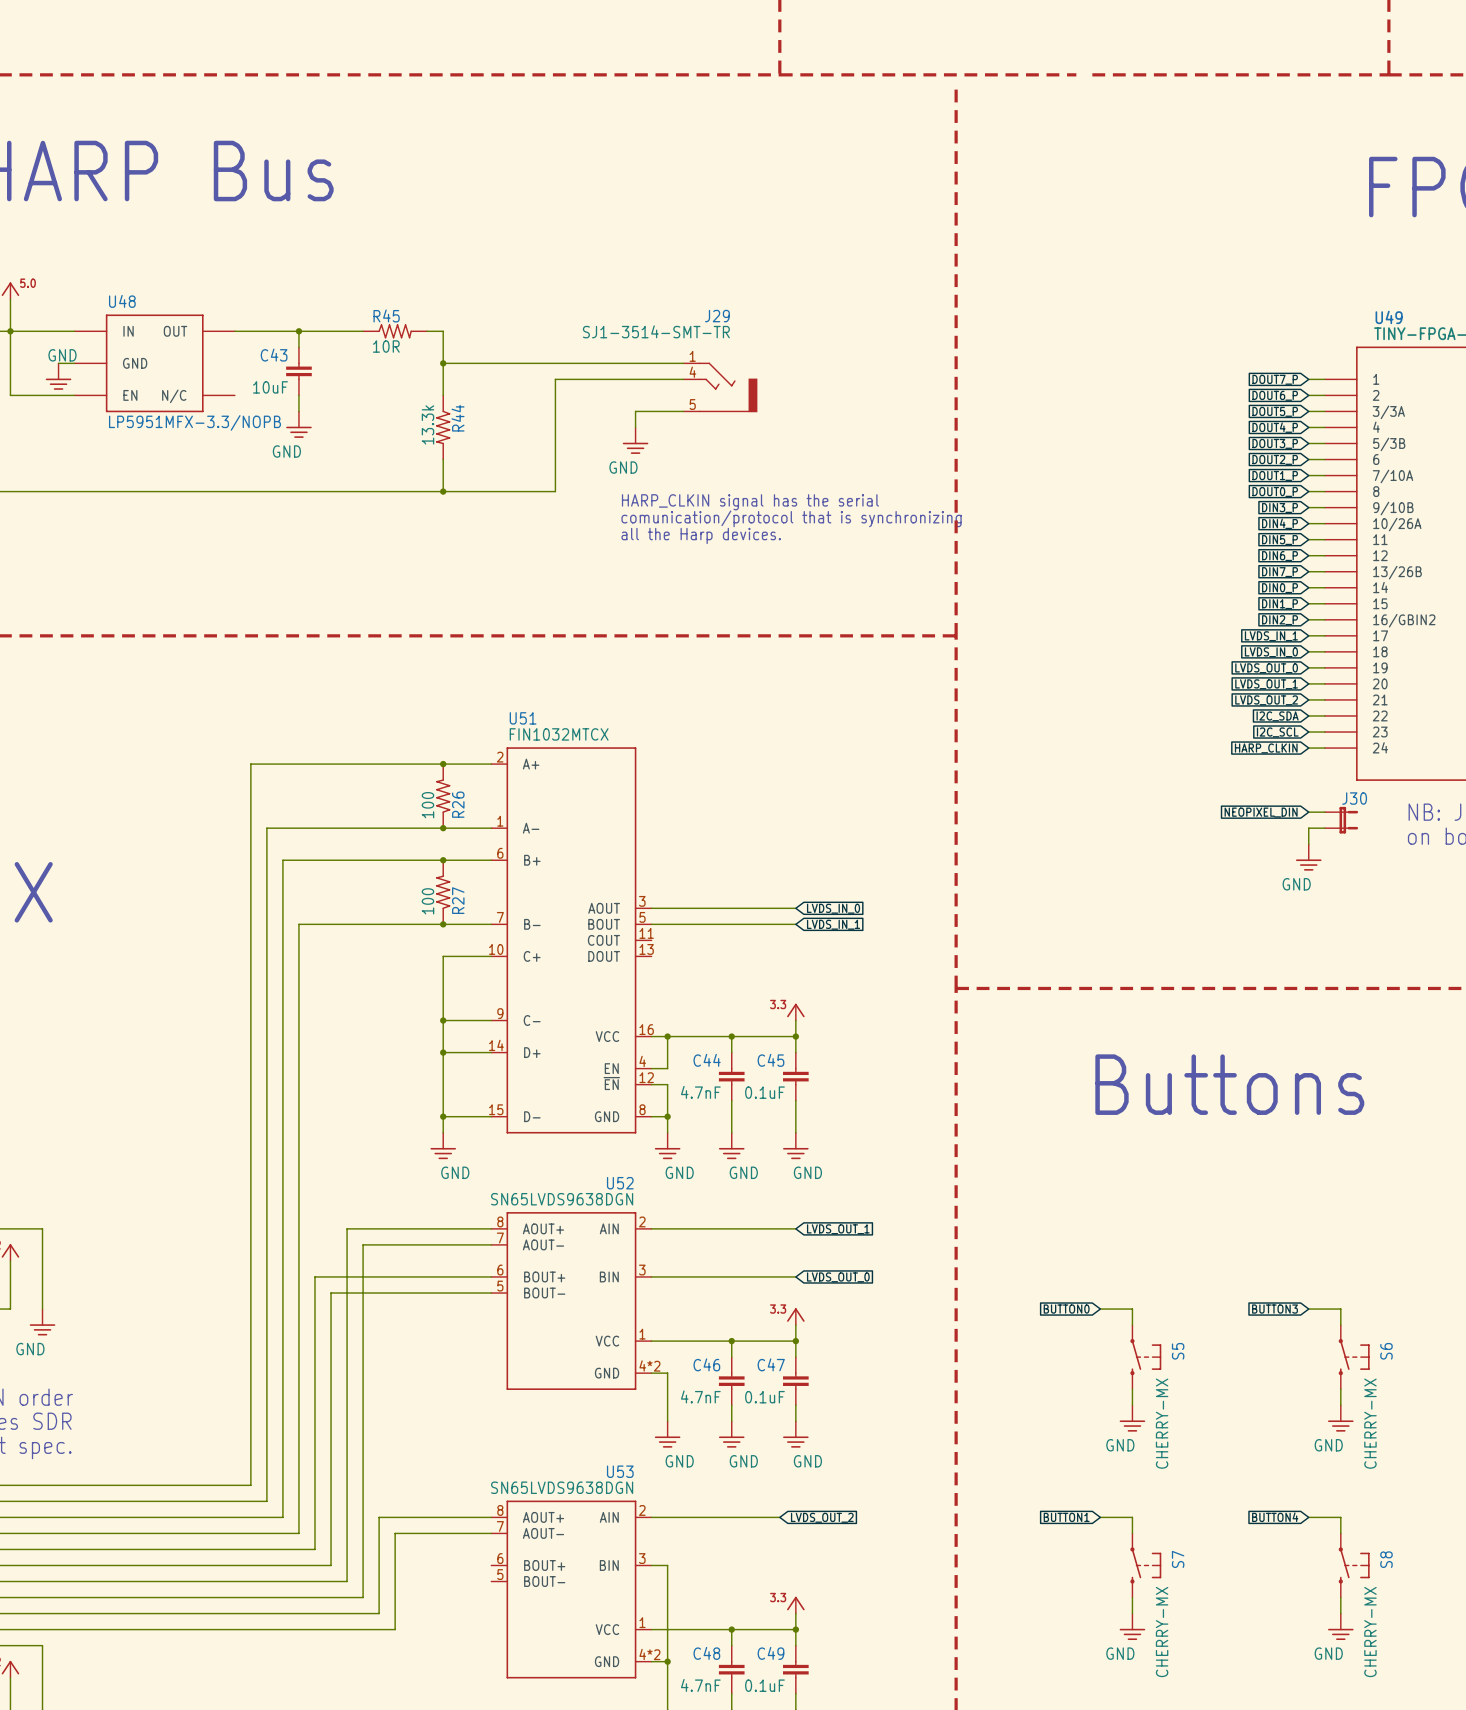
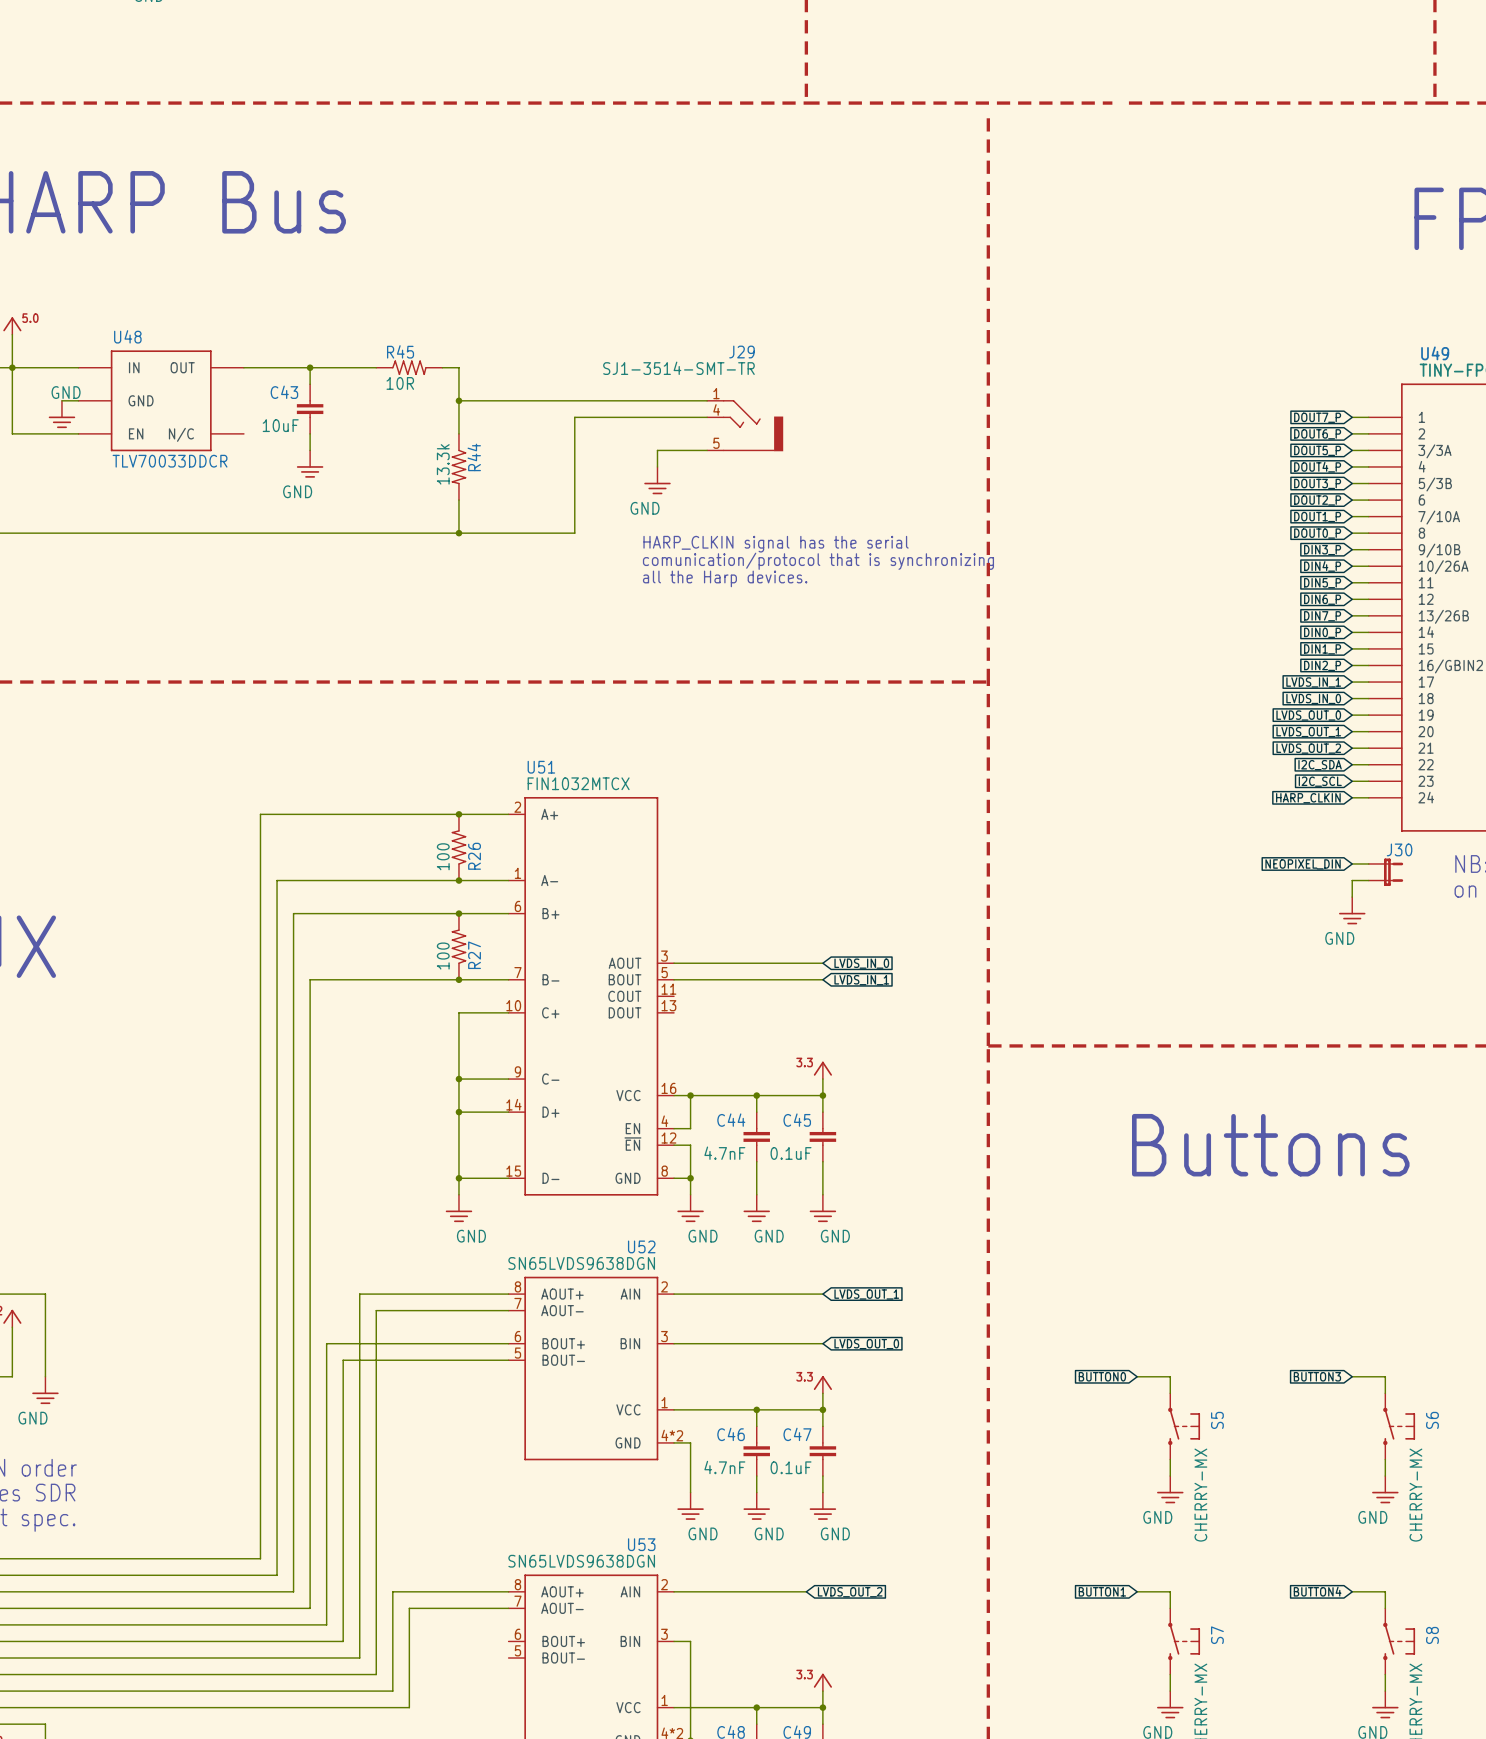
U48 value: LP5951MFX-3.3/NOPB (194, 422) -> TLV70033DDCR (170, 461)

